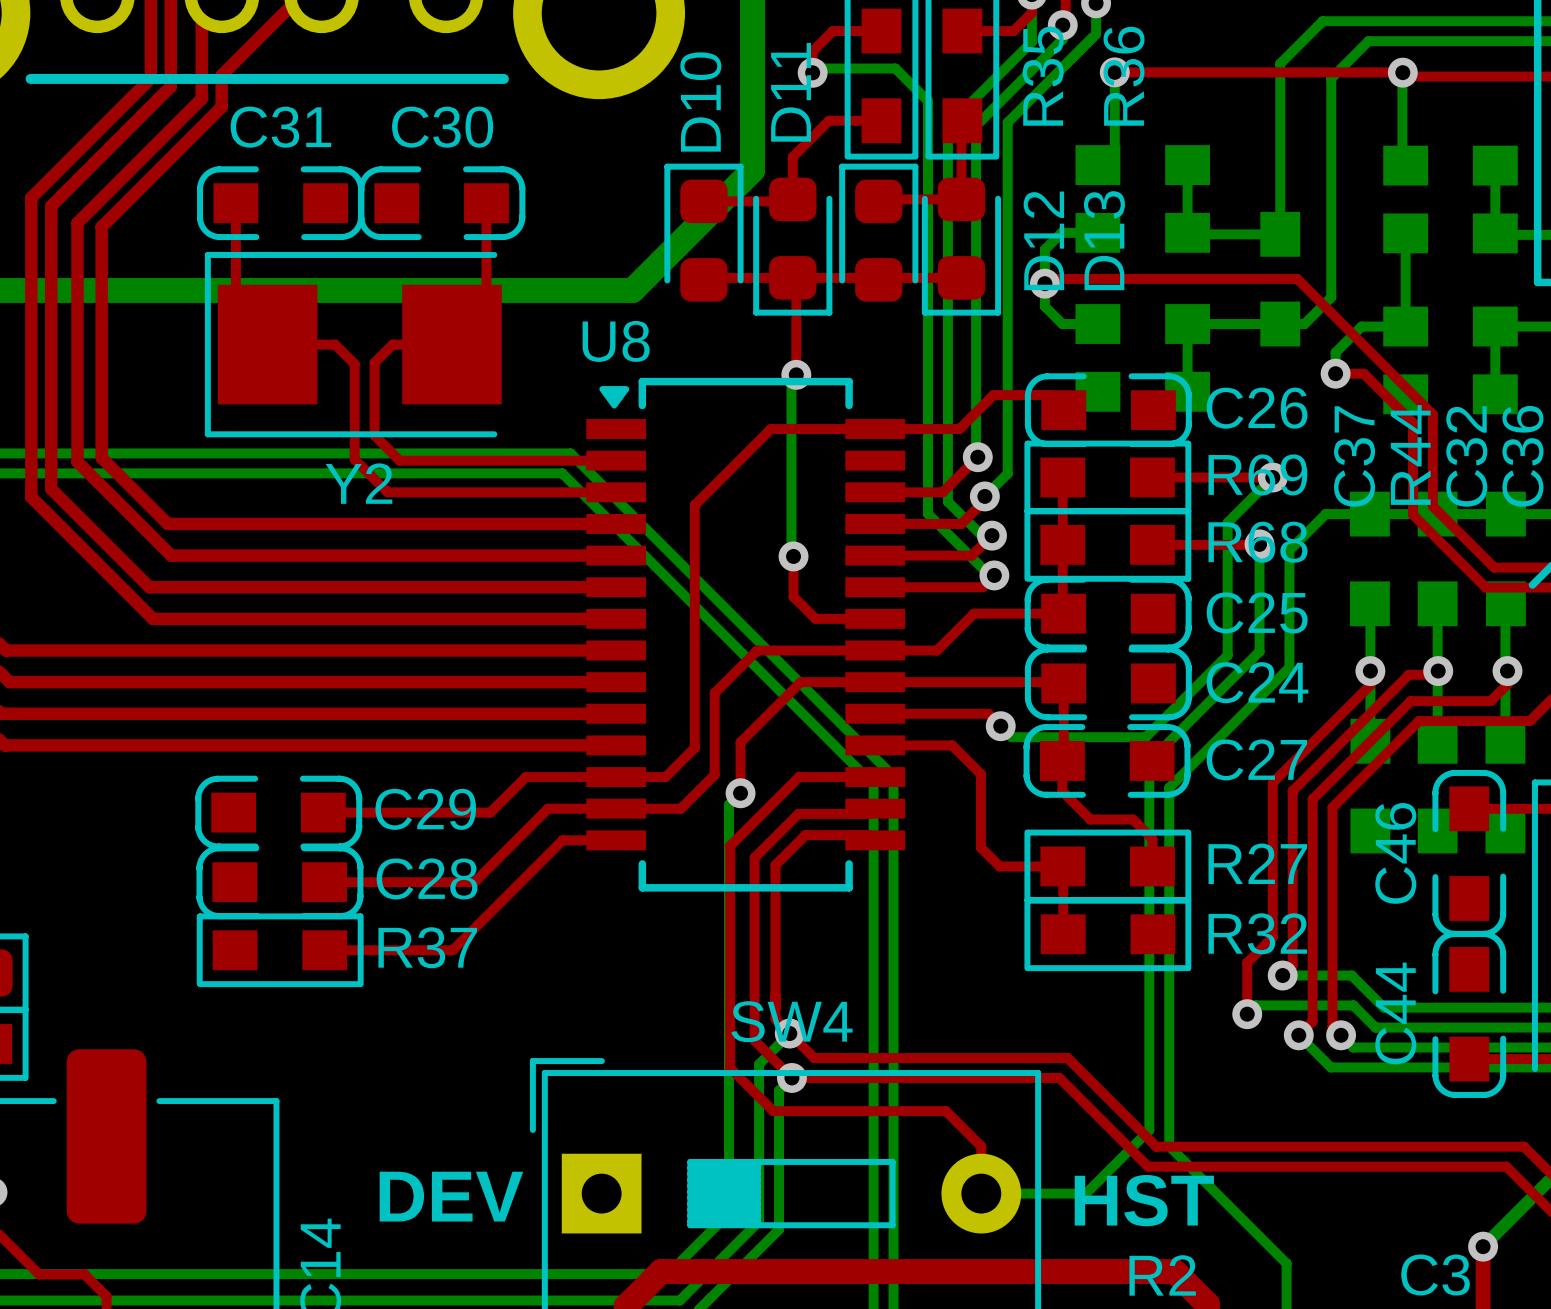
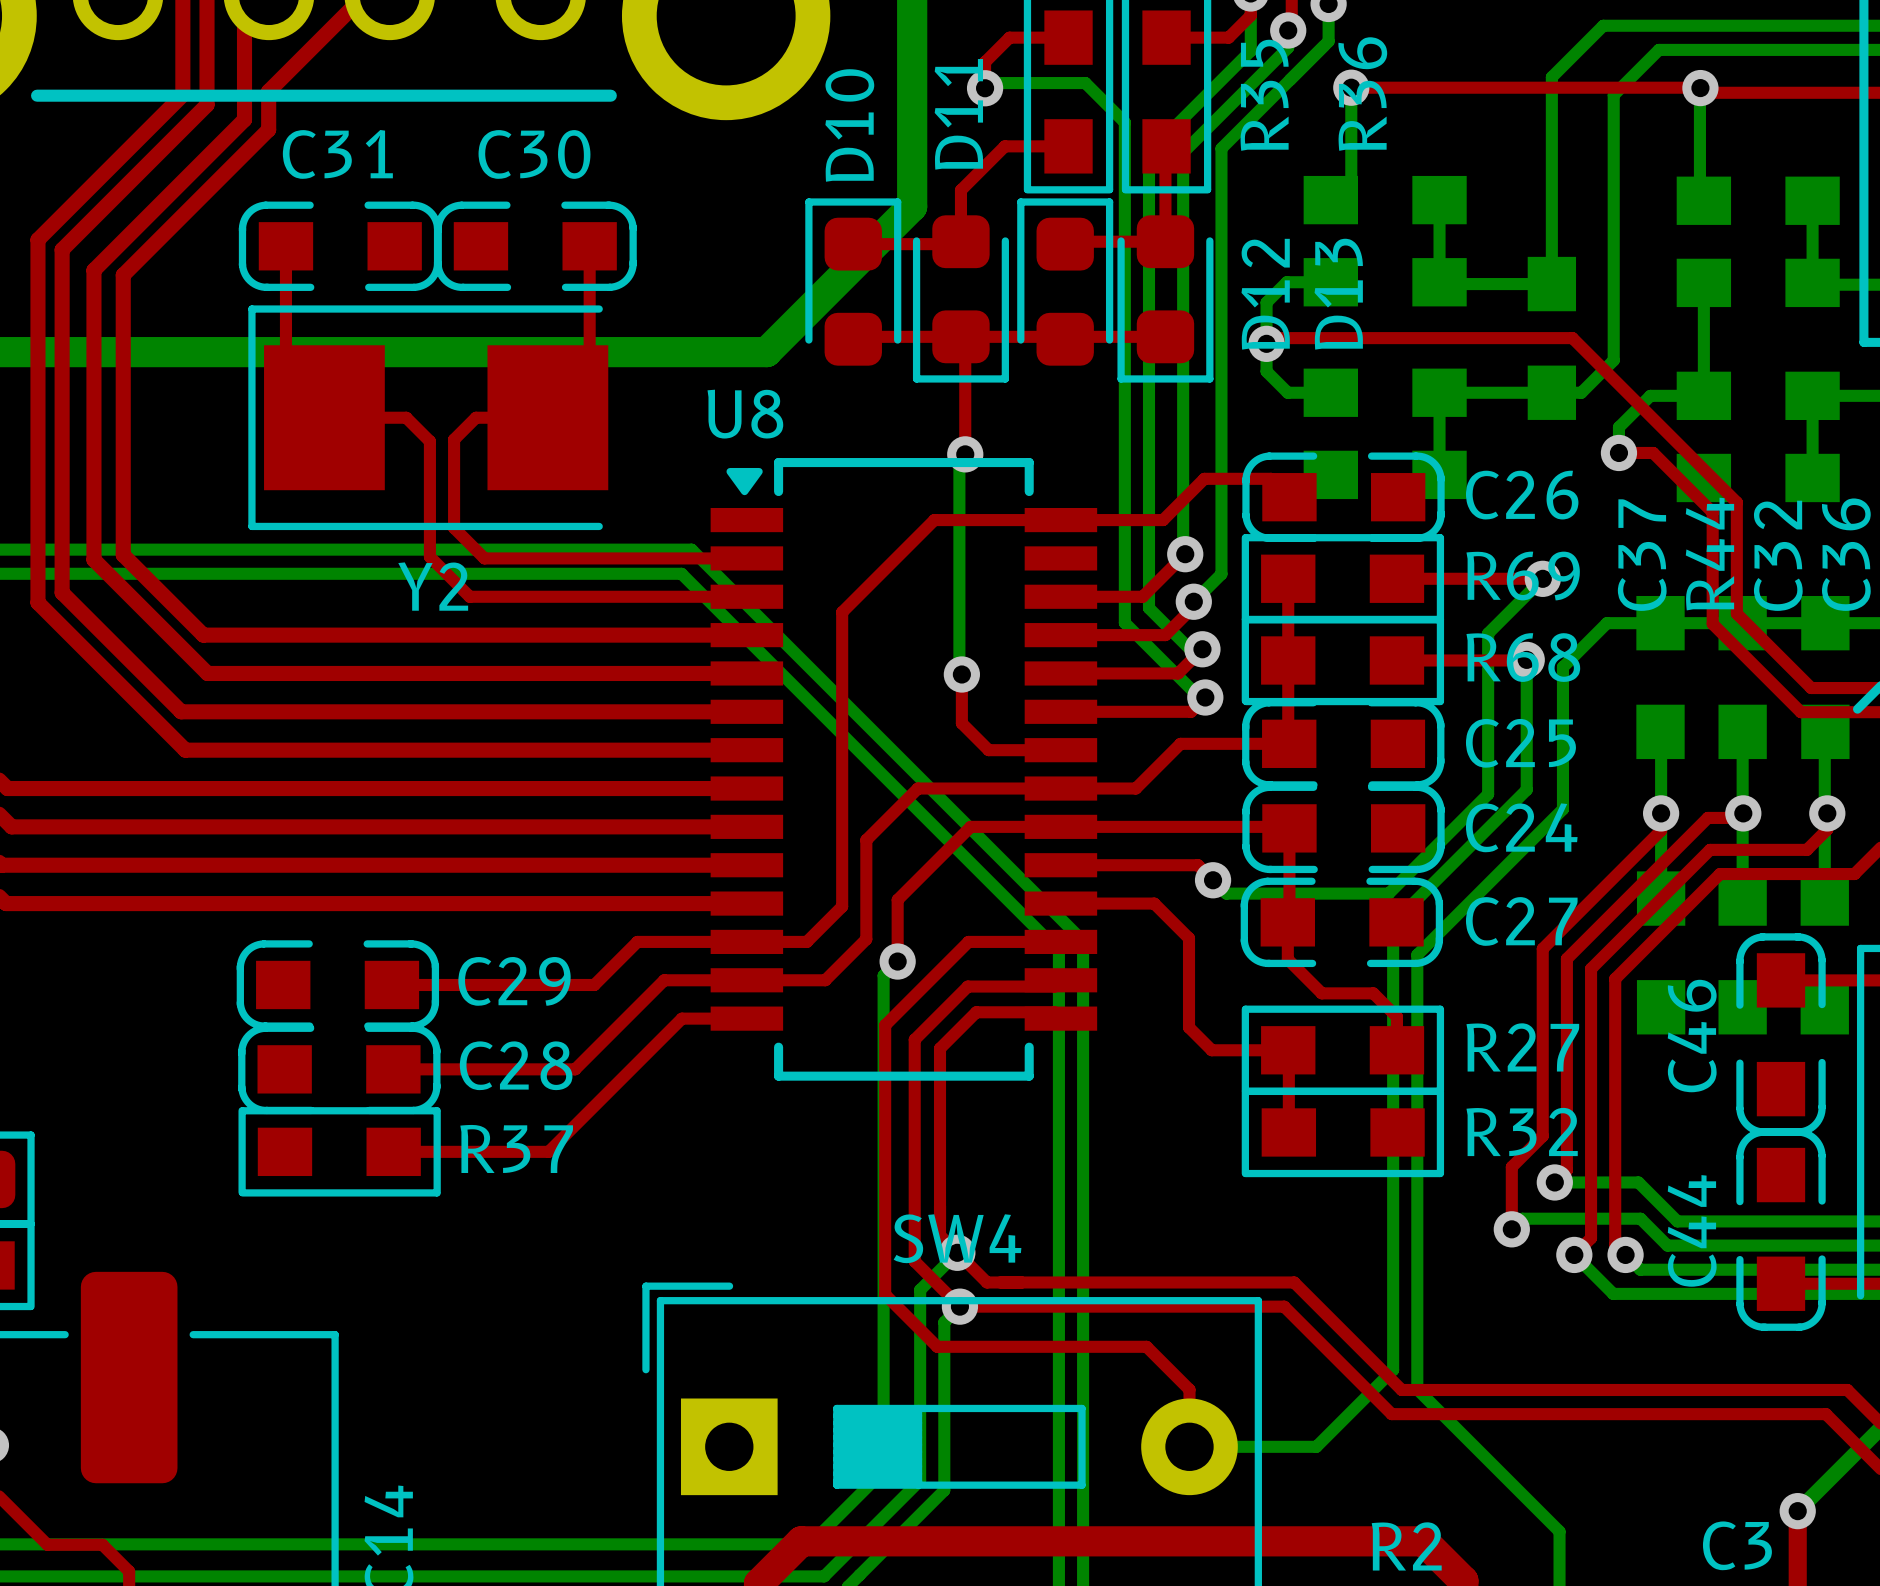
text: DEV (451, 1196) -> none
text: HST (1144, 1200) -> none

